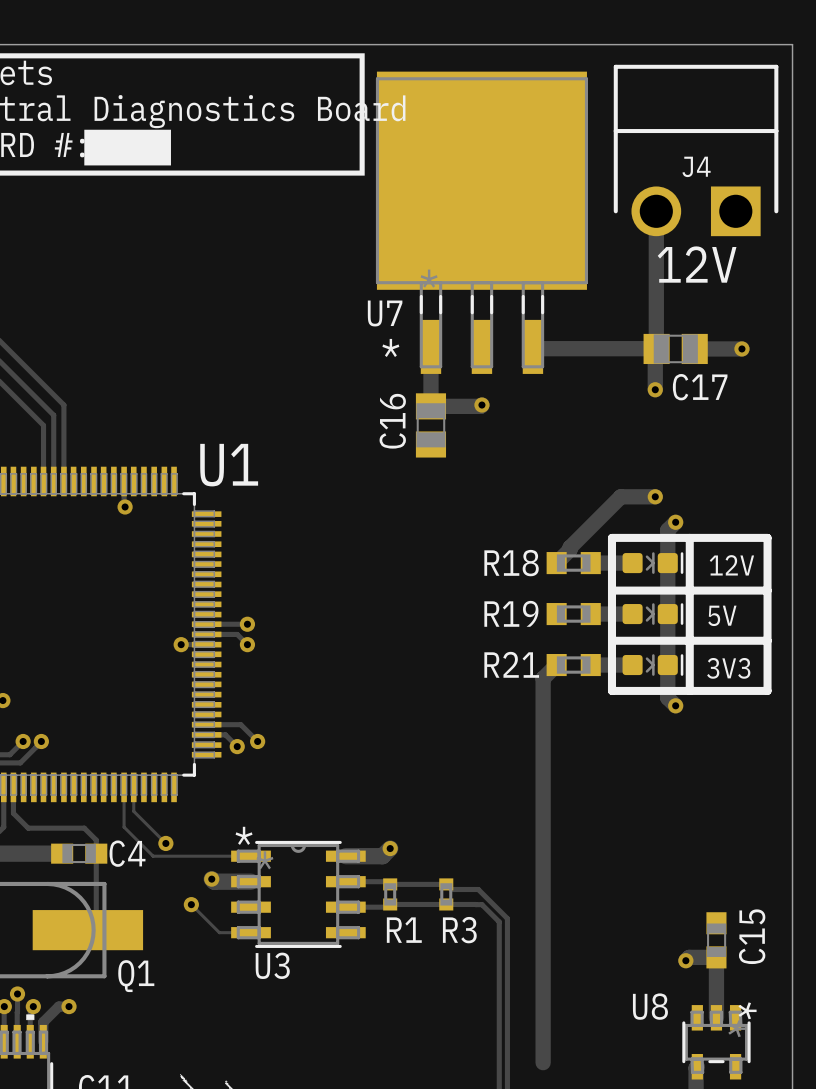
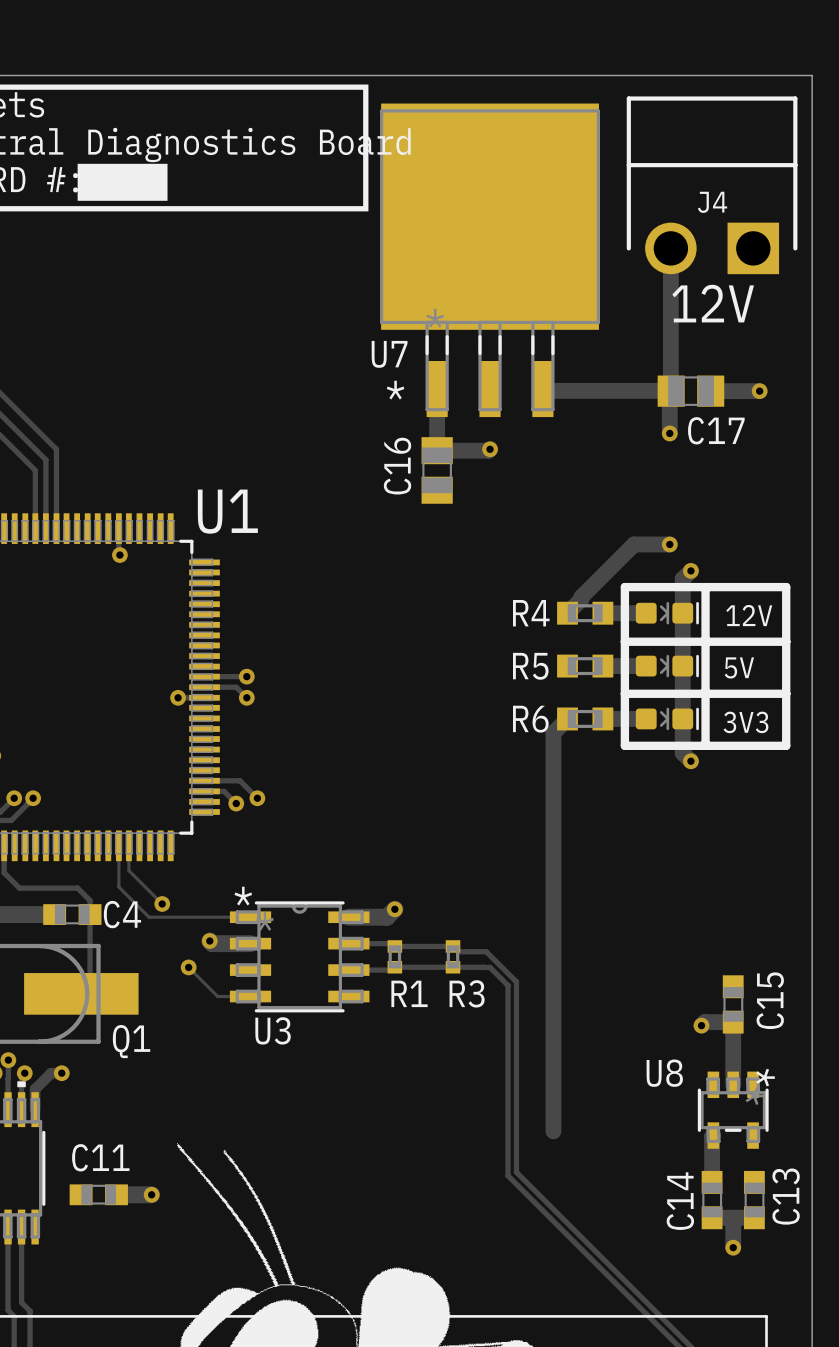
R18 name: R18 (511, 563) -> R4 (531, 613)
R19 name: R19 (511, 613) -> R5 (530, 666)
R21 name: R21 (511, 664) -> R6 (530, 719)

